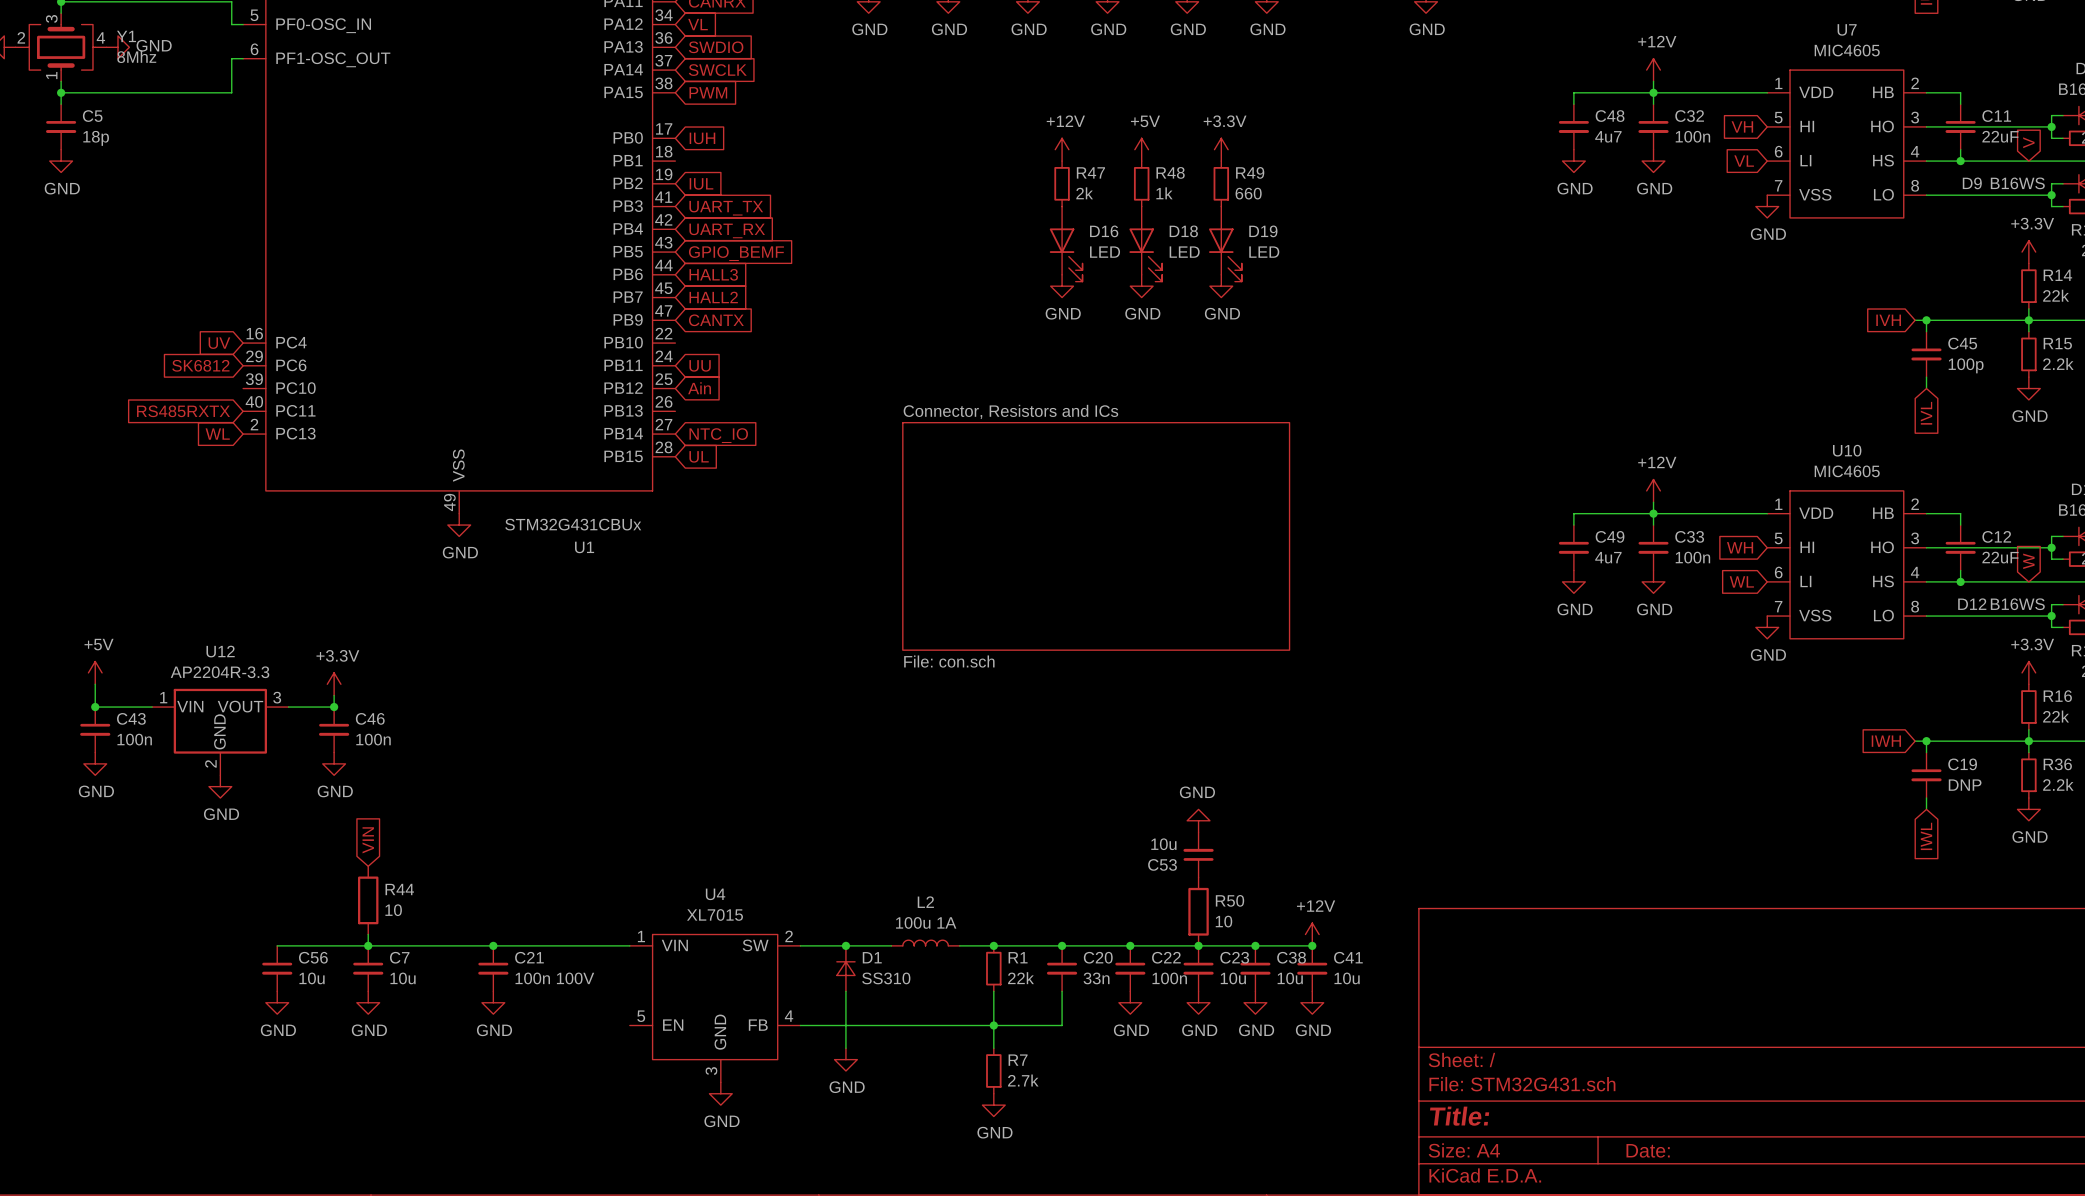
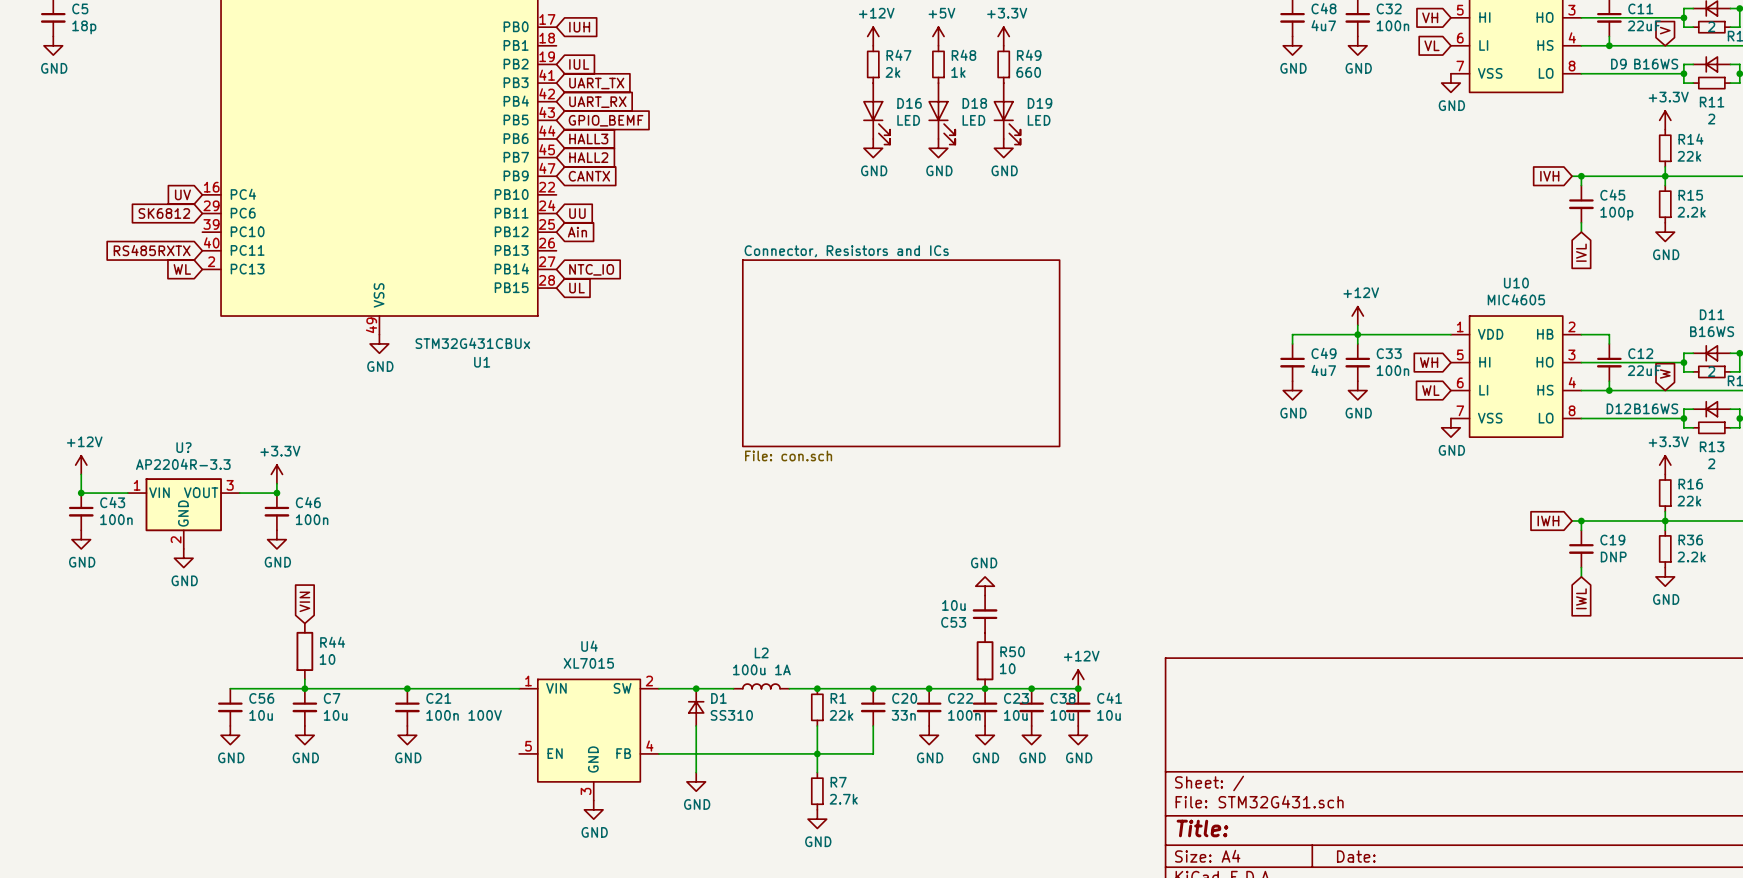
U12 name: U12 (220, 651) -> U? (183, 447)
power symbol: +5V (95, 672) -> +12V (81, 465)

